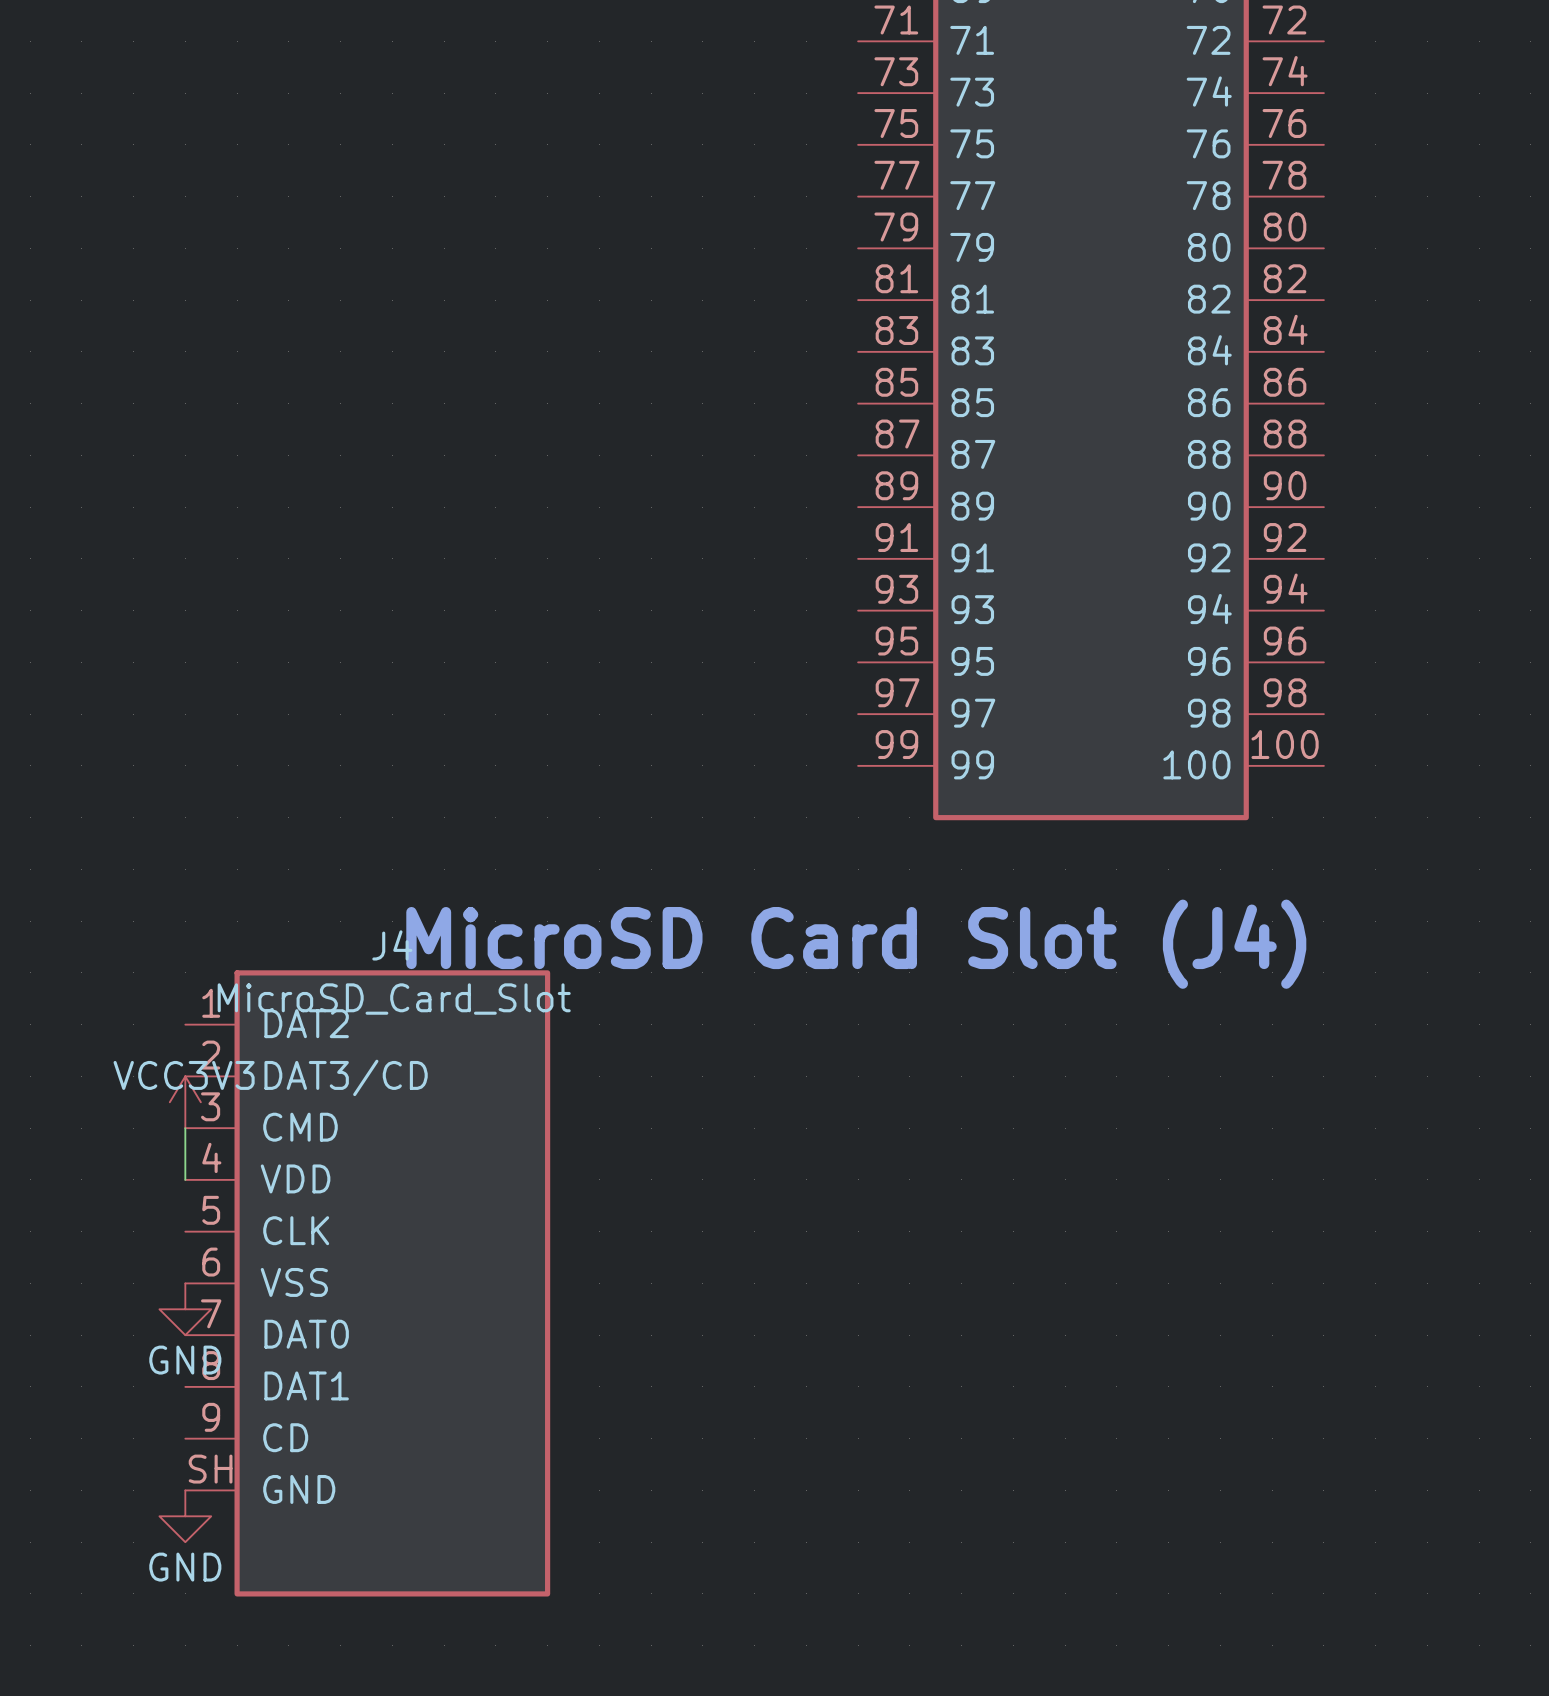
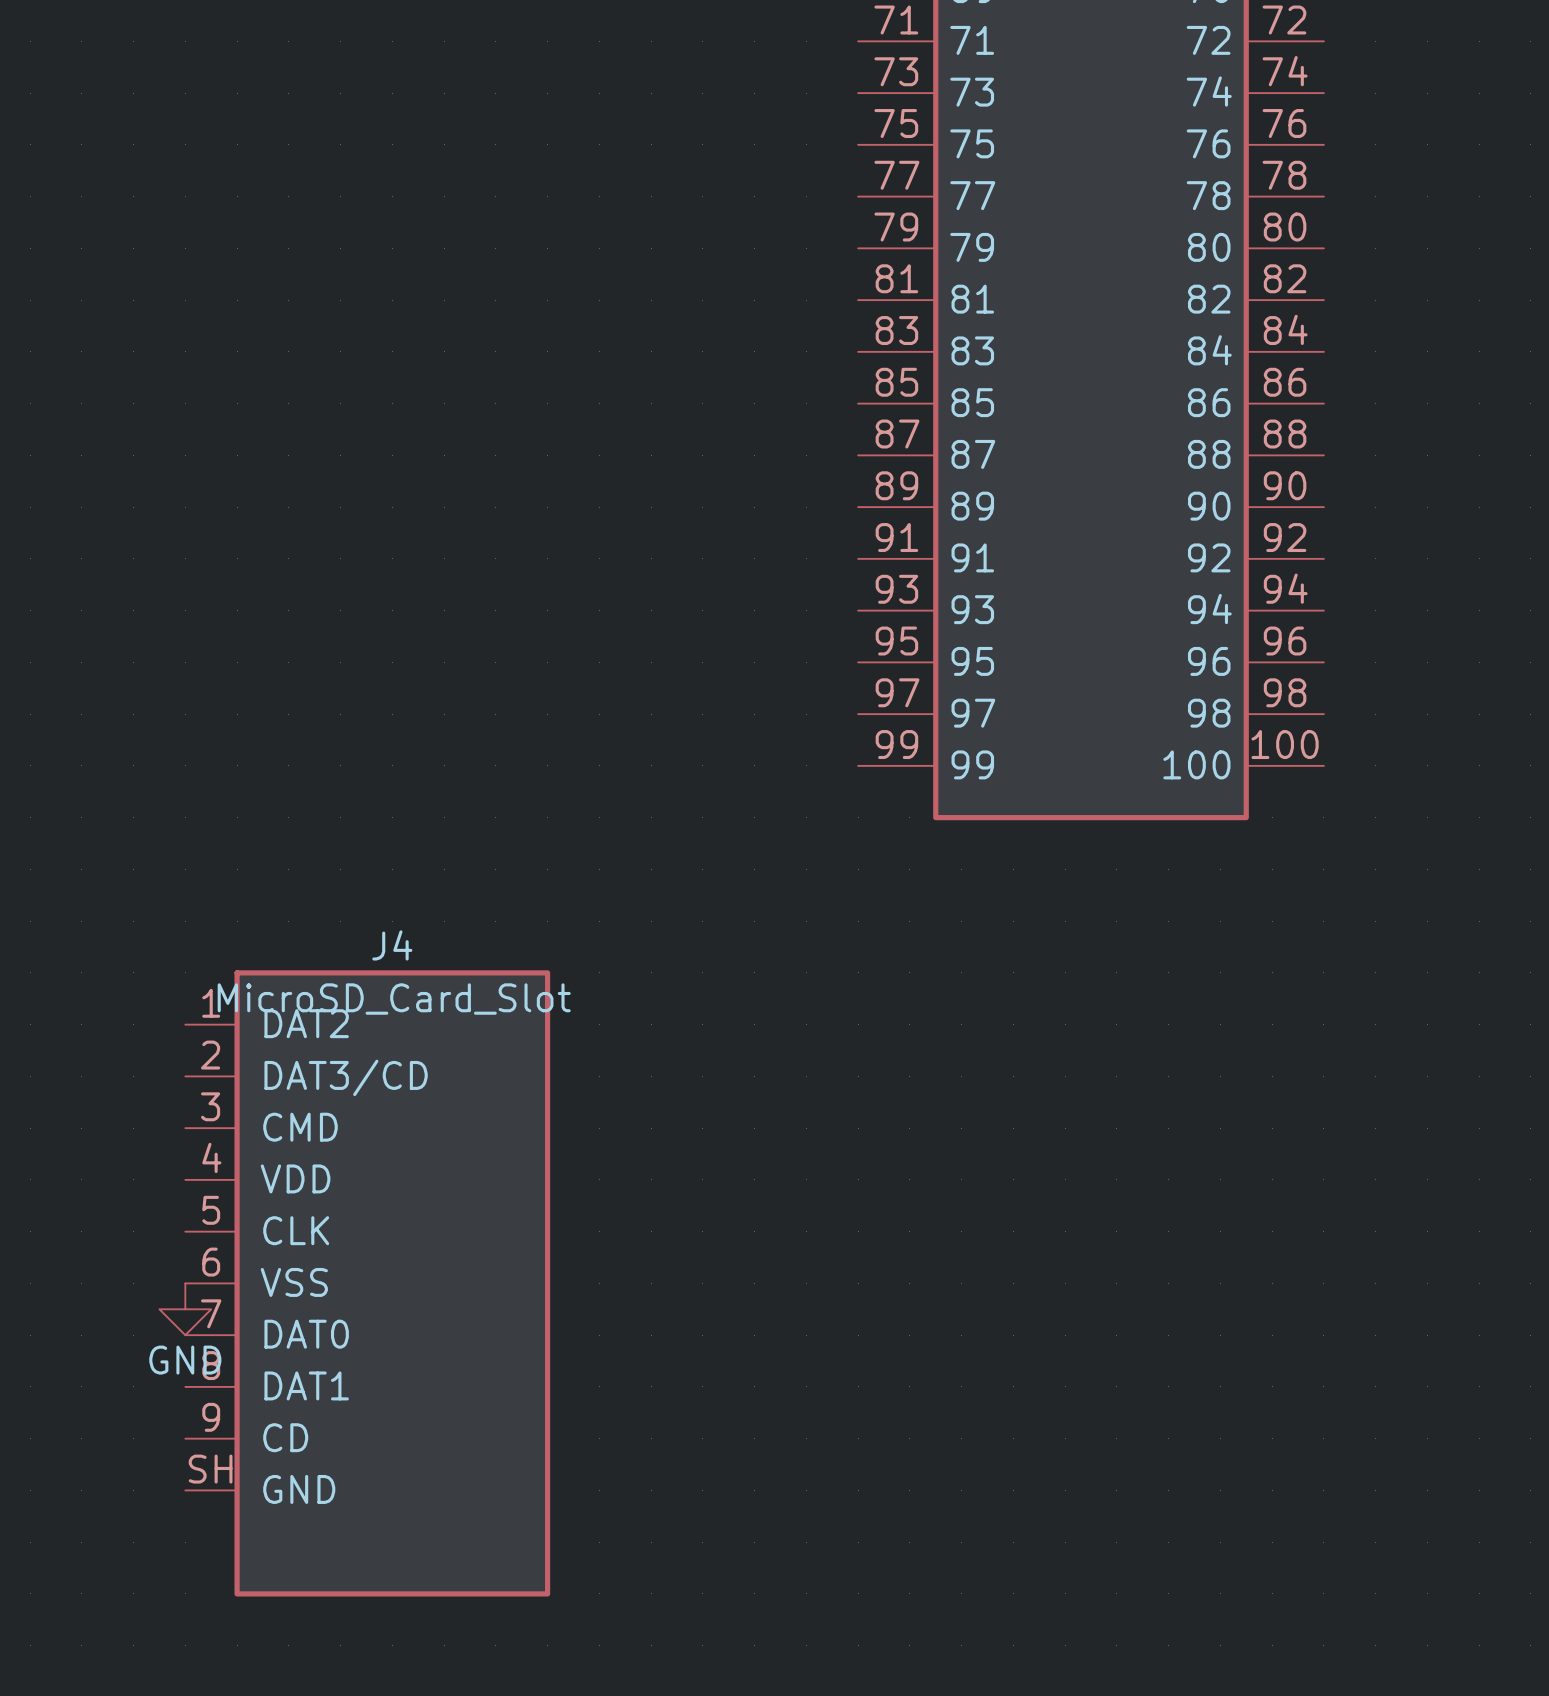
text: MicroSD Card Slot (J4) (856, 944) -> none
power symbol: VCC3V3 (185, 1102) -> none
wire: (185, 1128) (185, 1179) -> none
power symbol: GND (185, 1516) -> none

